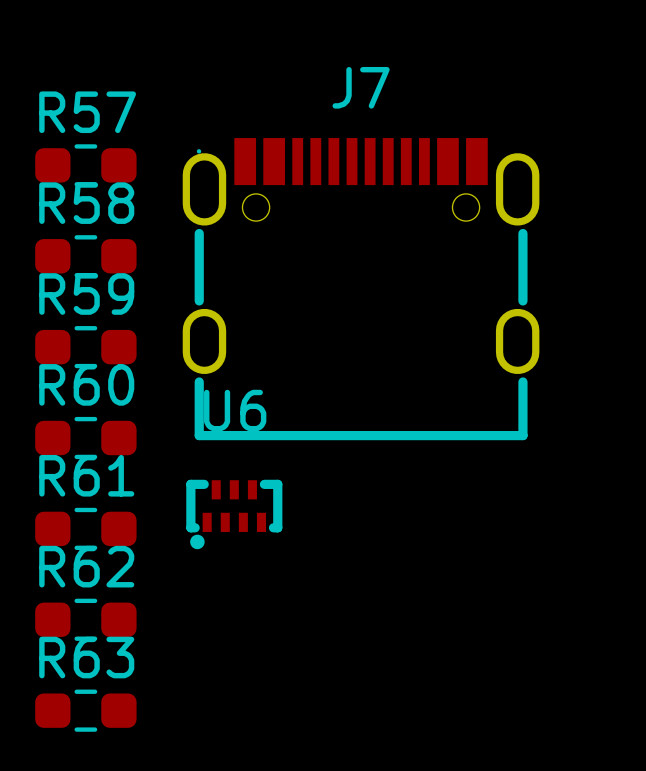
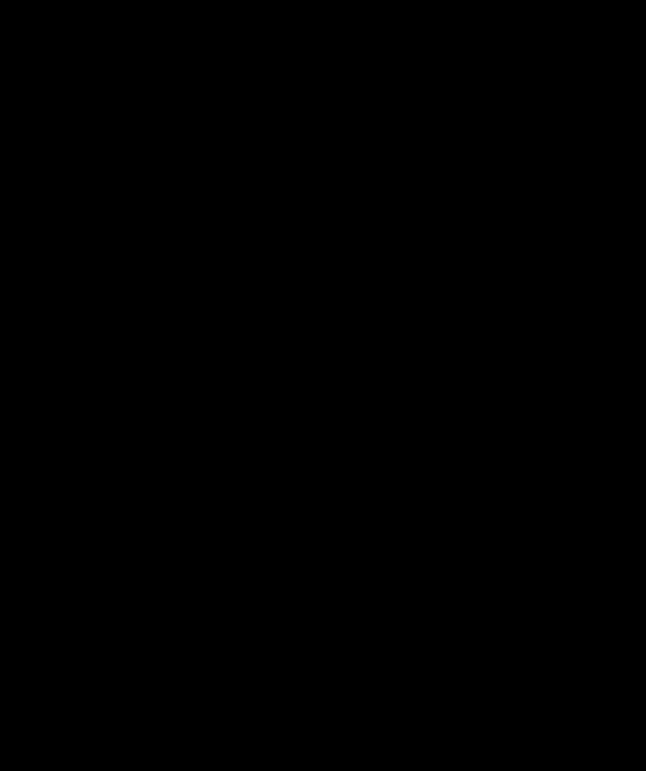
R57: (85, 165) -> none
R58: (85, 256) -> none
J7: (361, 289) -> none
R59: (85, 347) -> none
R60: (85, 438) -> none
U6: (234, 514) -> none
R61: (85, 528) -> none
R62: (85, 619) -> none
R63: (85, 710) -> none

